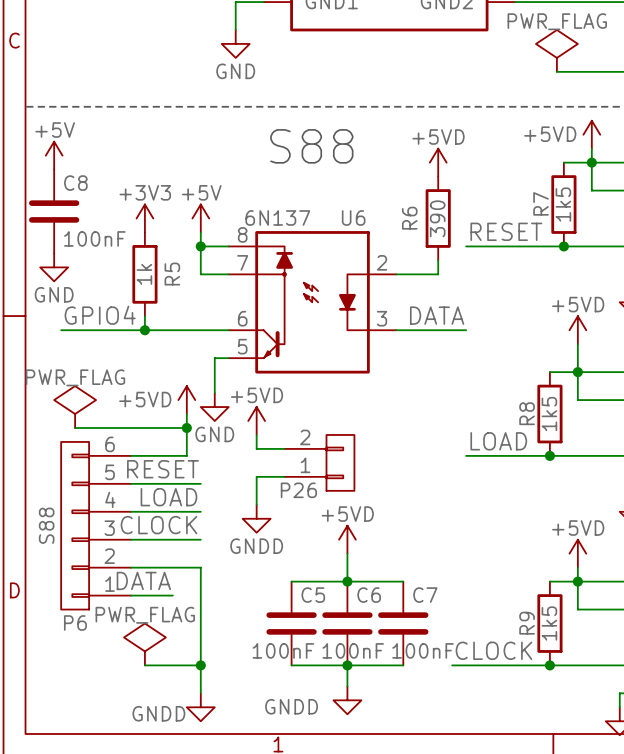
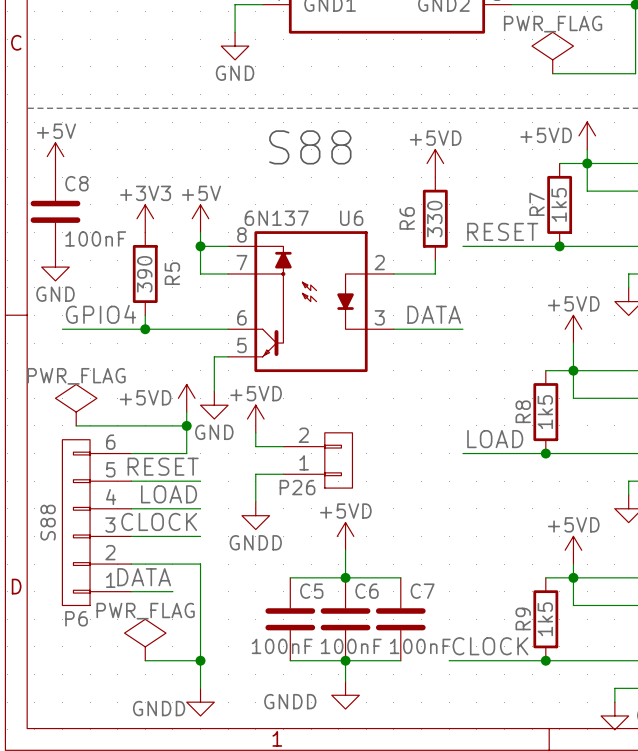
R6 value: 390 (437, 218) -> 330 (434, 219)
R5 value: 1k (144, 274) -> 390 (144, 274)

